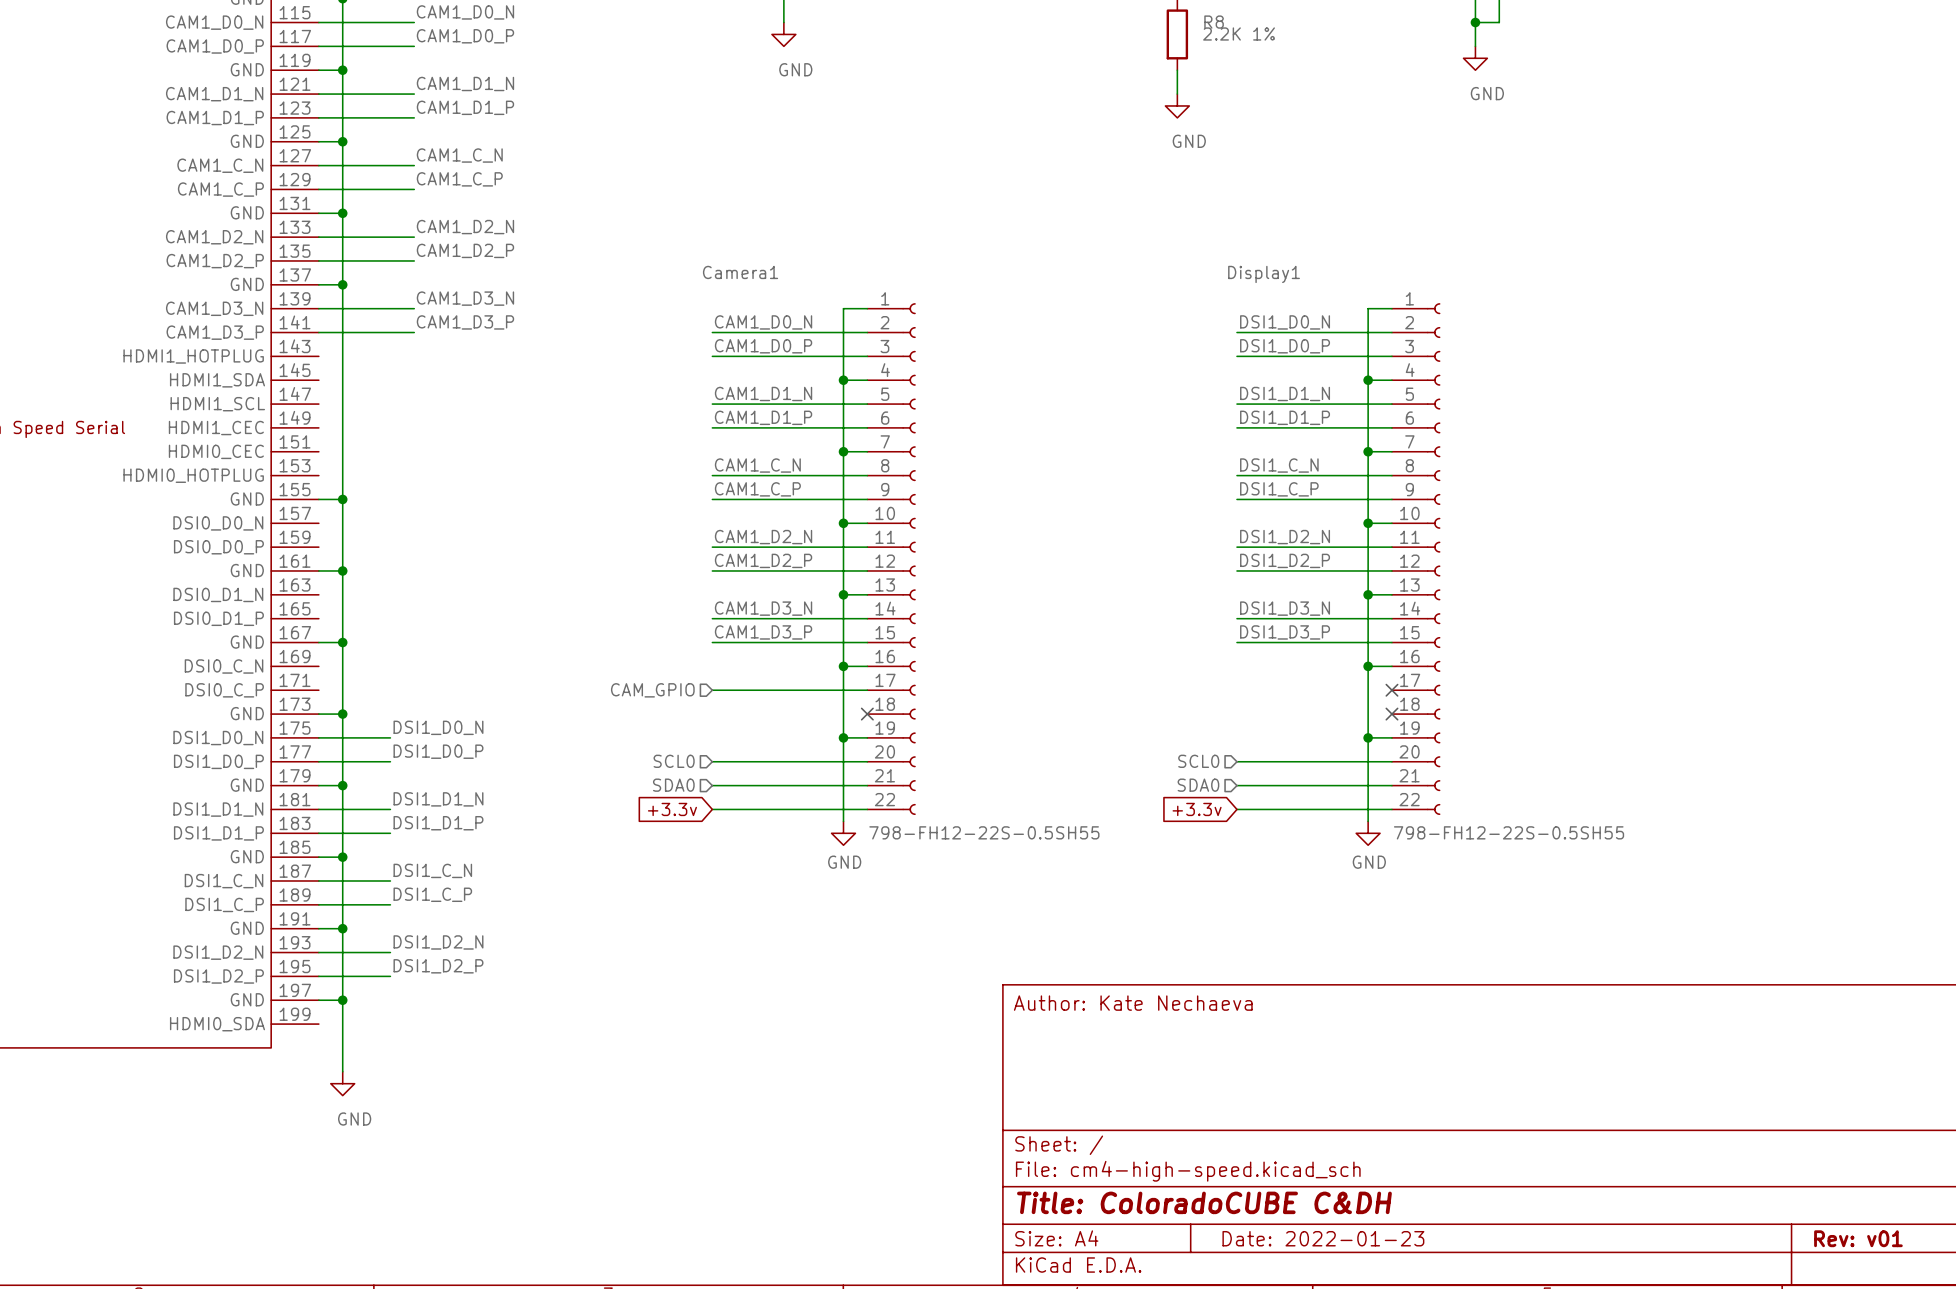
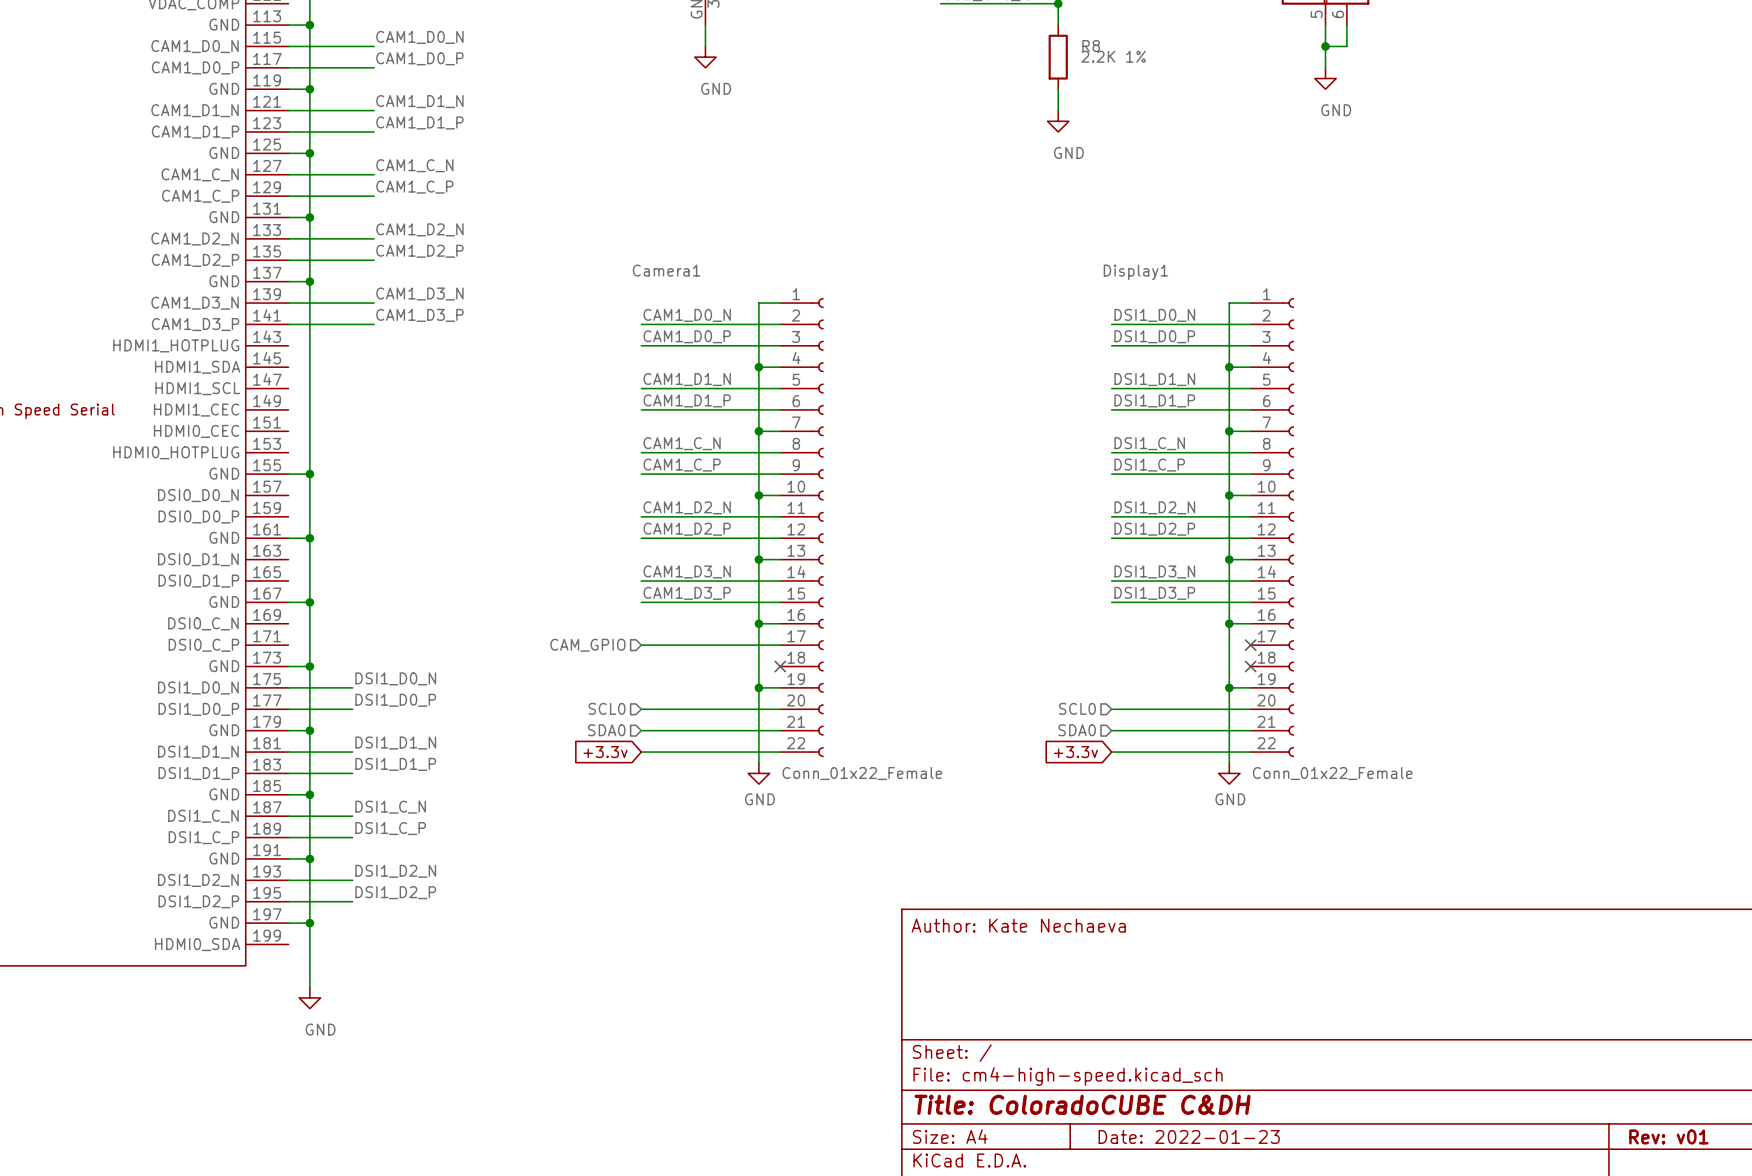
Camera1 value: 798-FH12-22S-0.5SH55 (984, 832) -> Conn_01x22_Female (862, 773)
Display1 value: 798-FH12-22S-0.5SH55 (1509, 832) -> Conn_01x22_Female (1332, 773)

